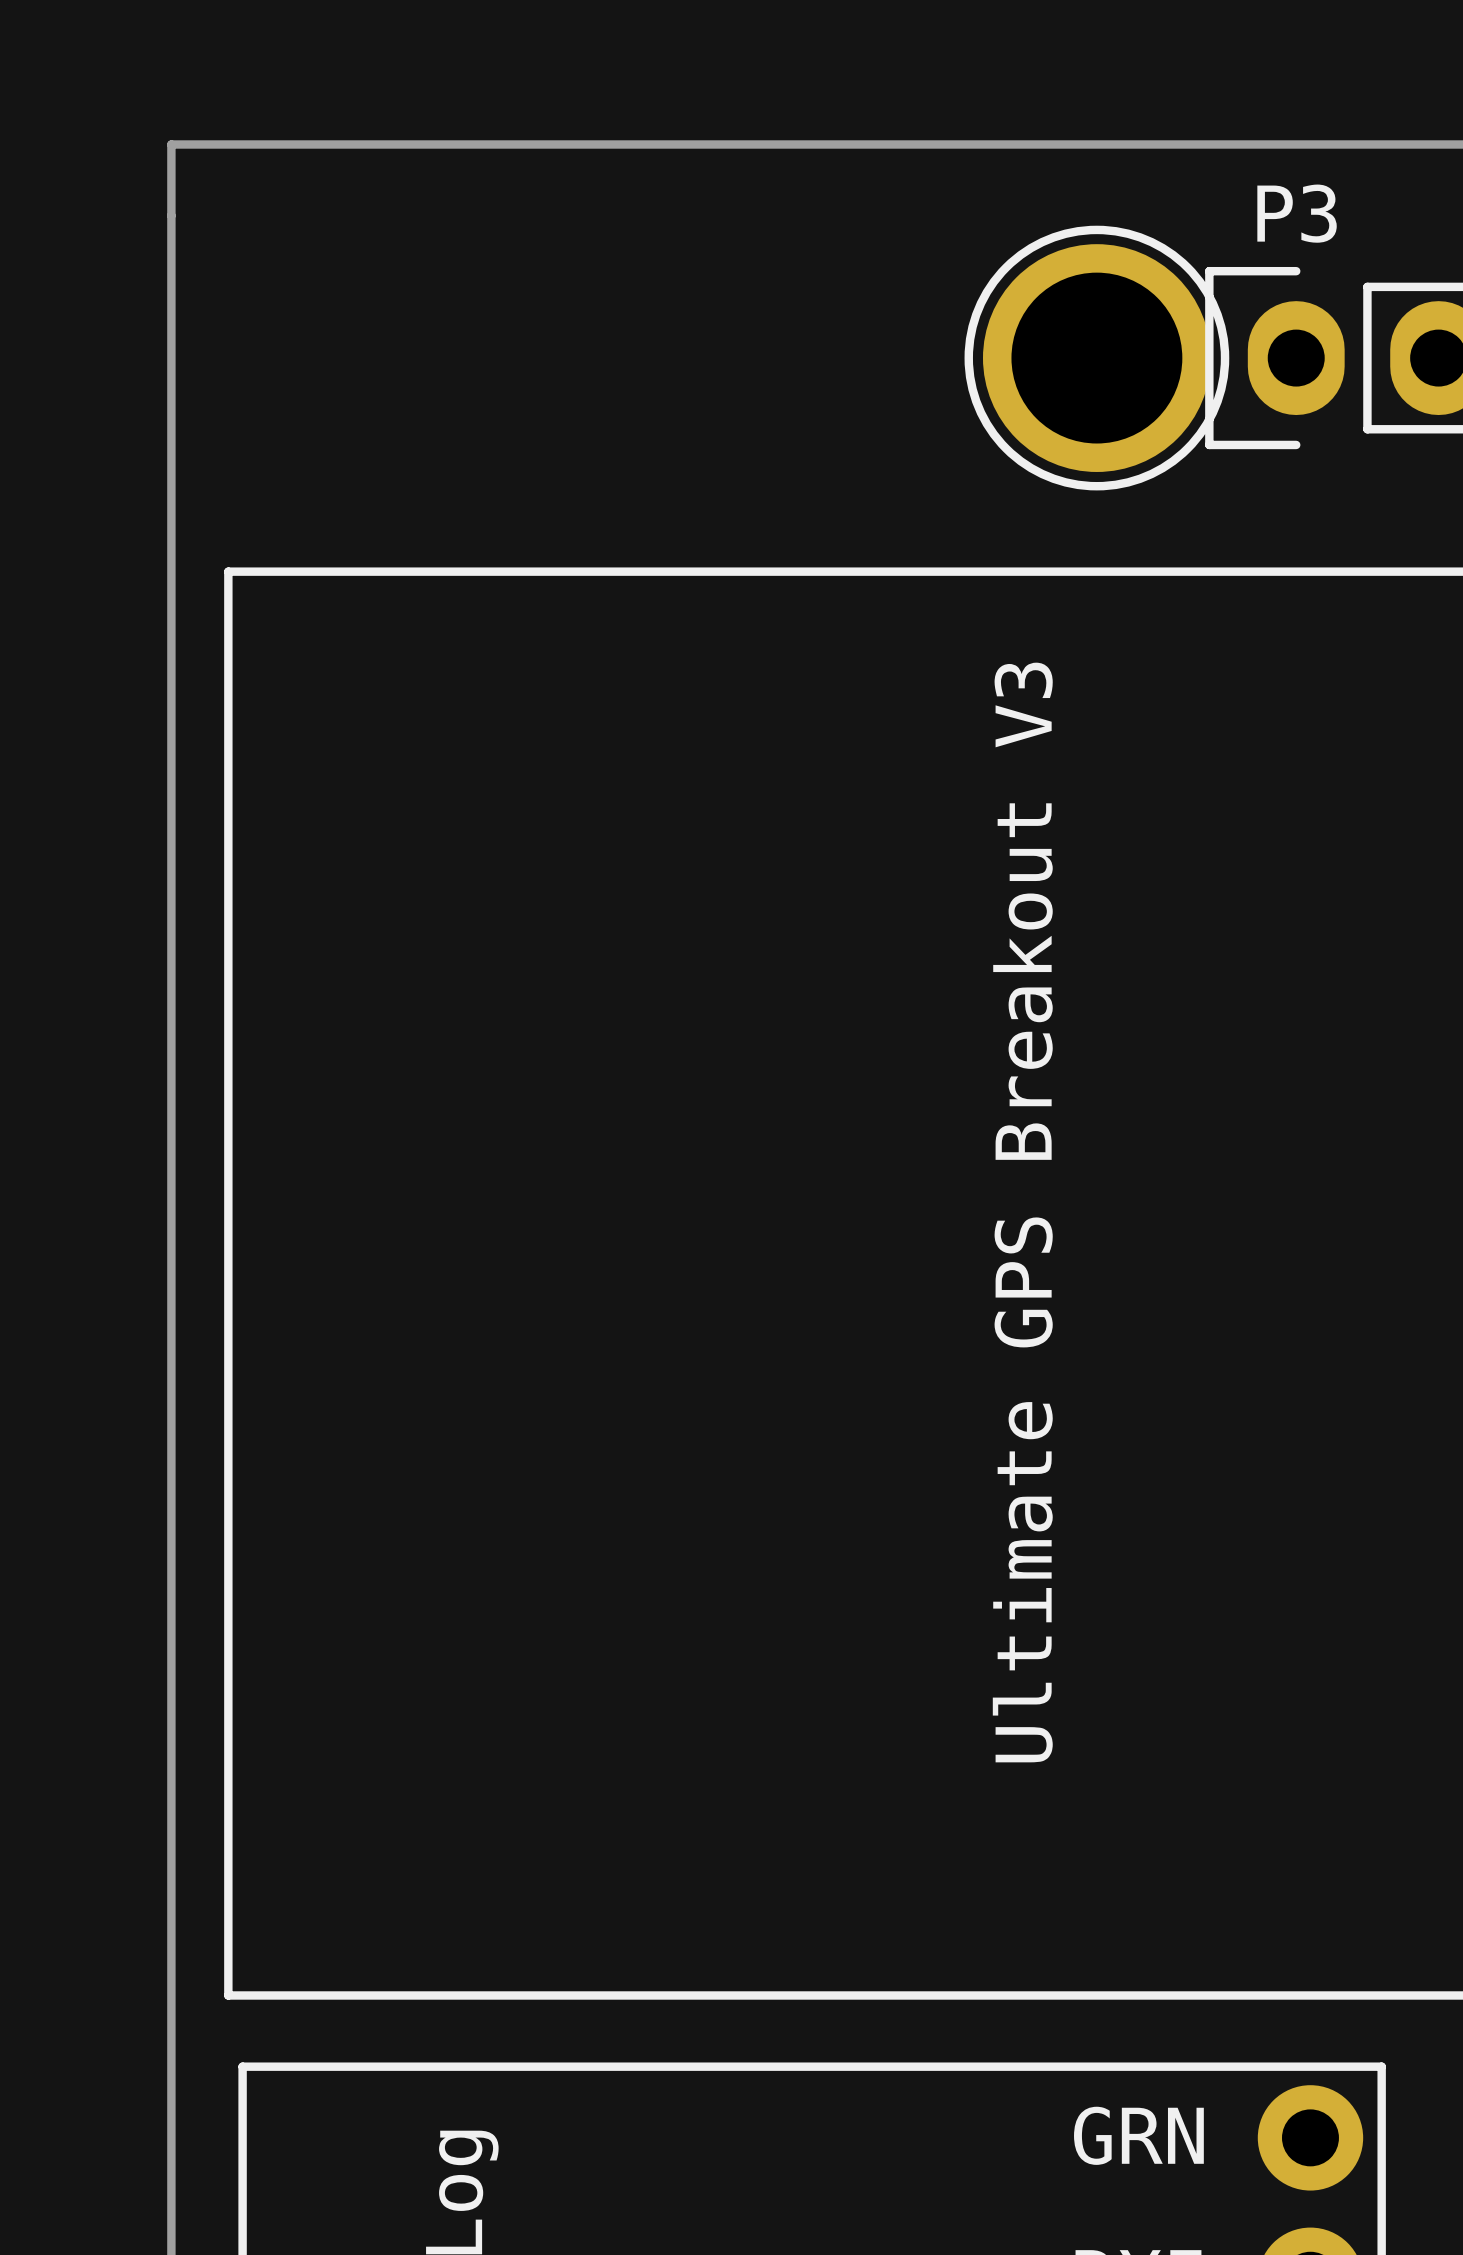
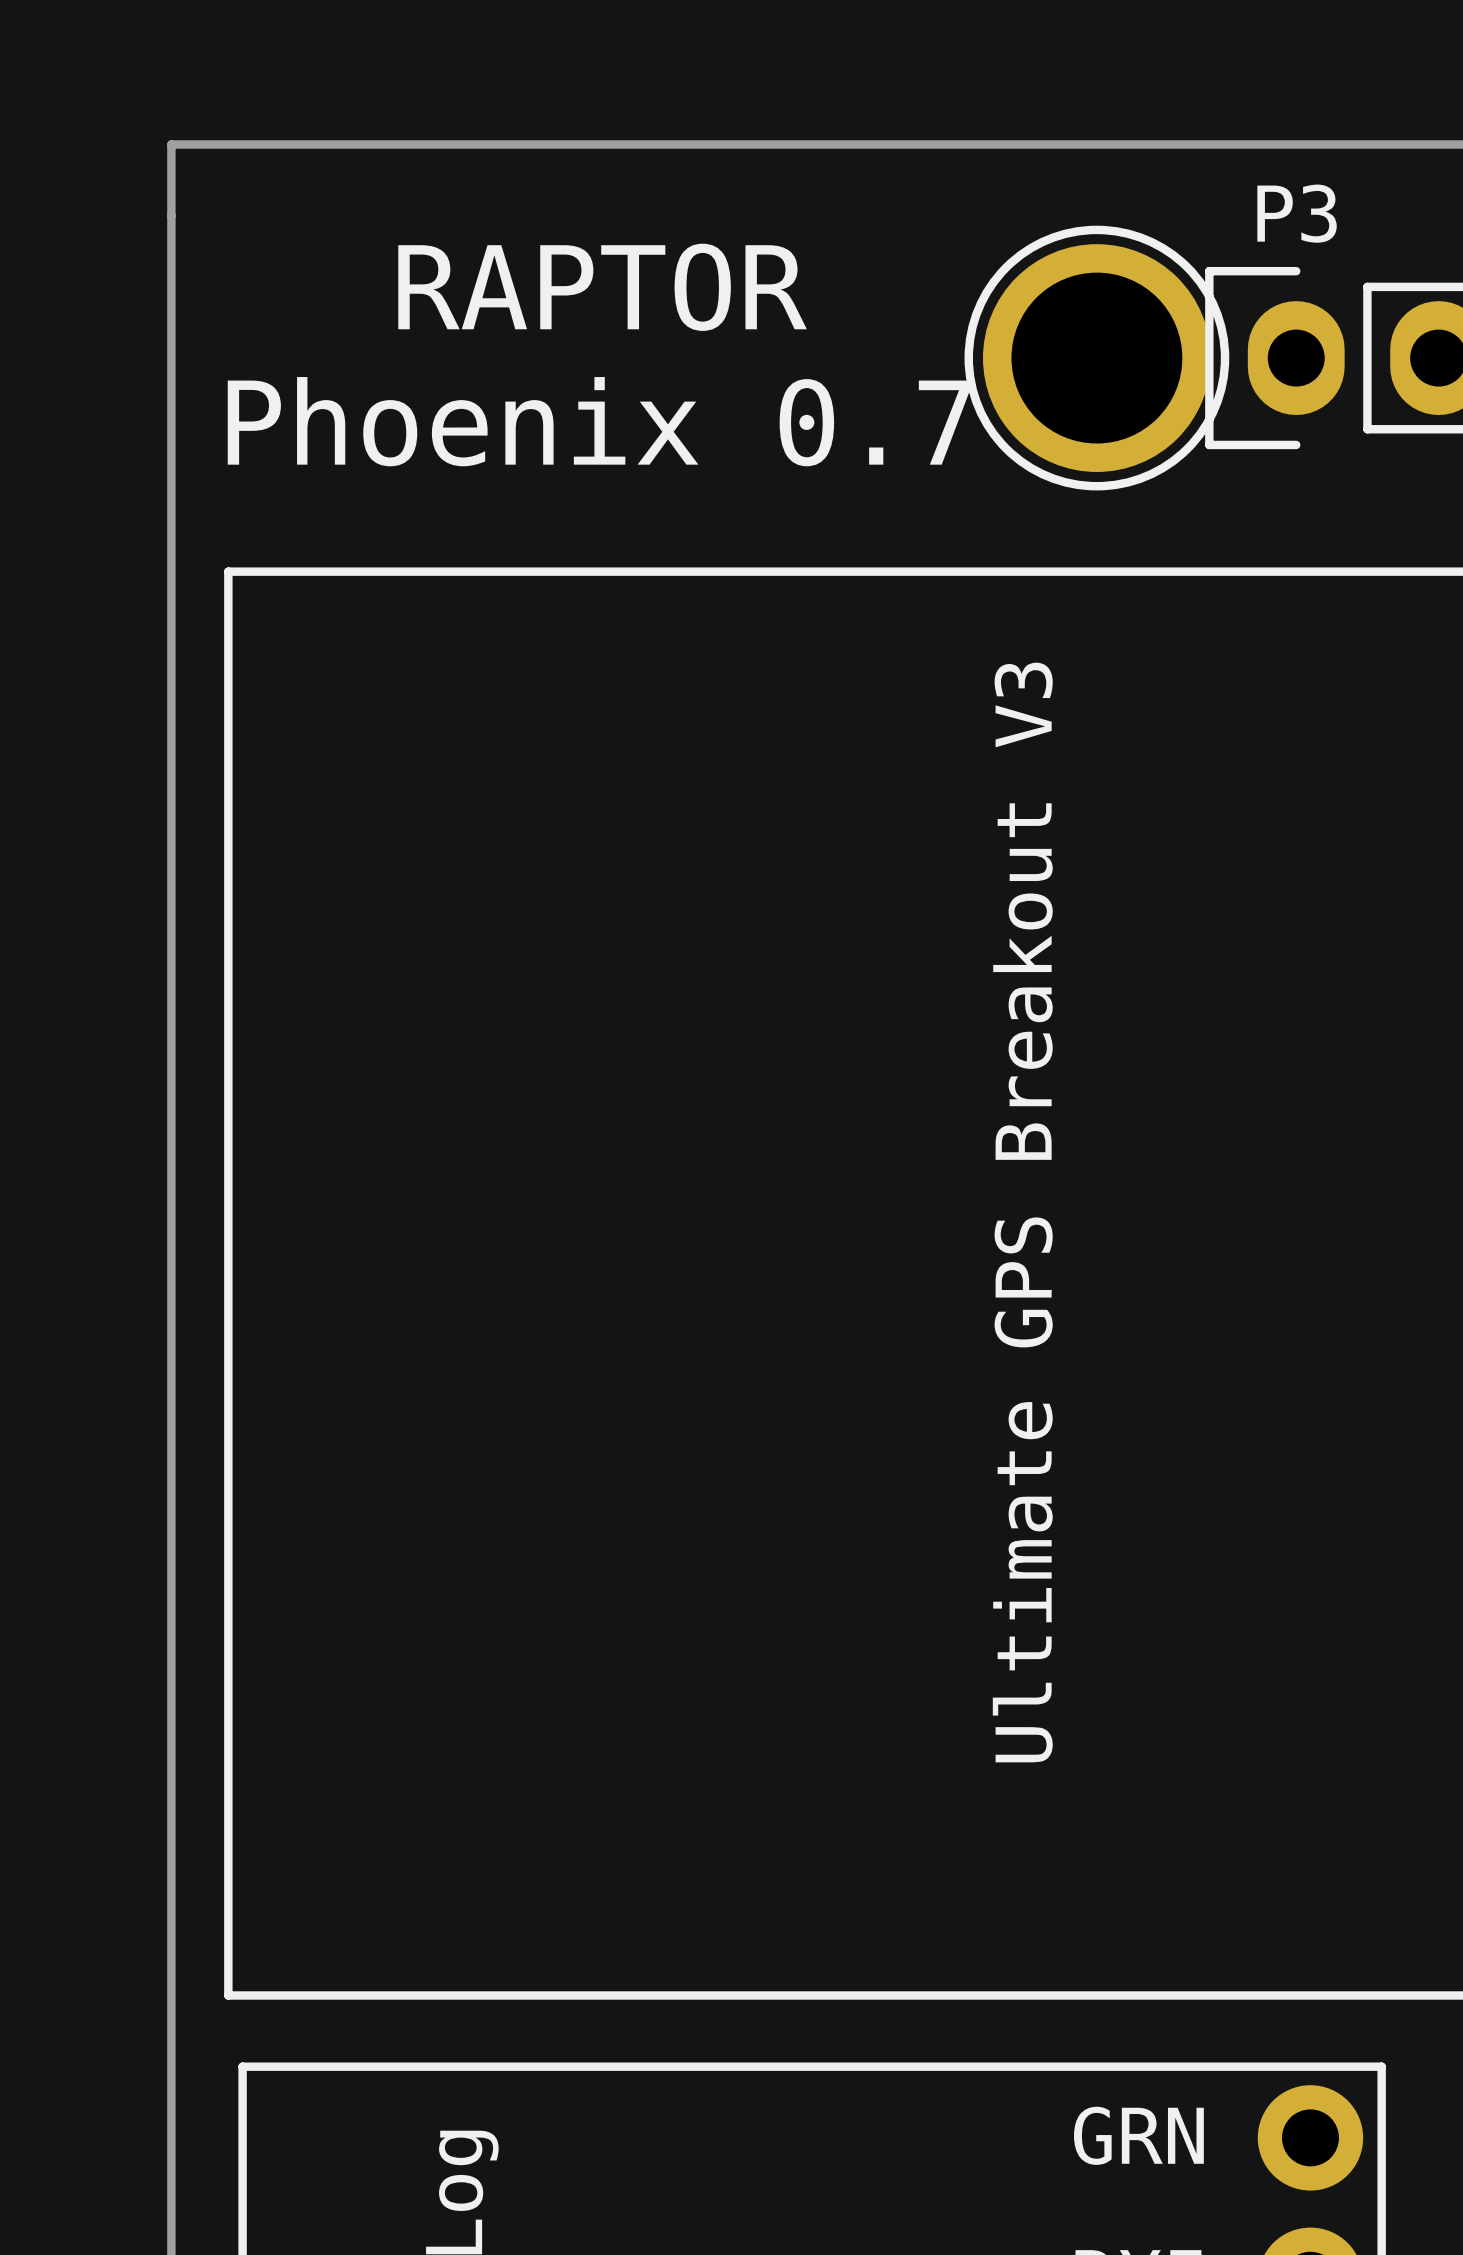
text: none -> RAPTOR (602, 287)
text: none -> Phoenix 0.7 (599, 421)

